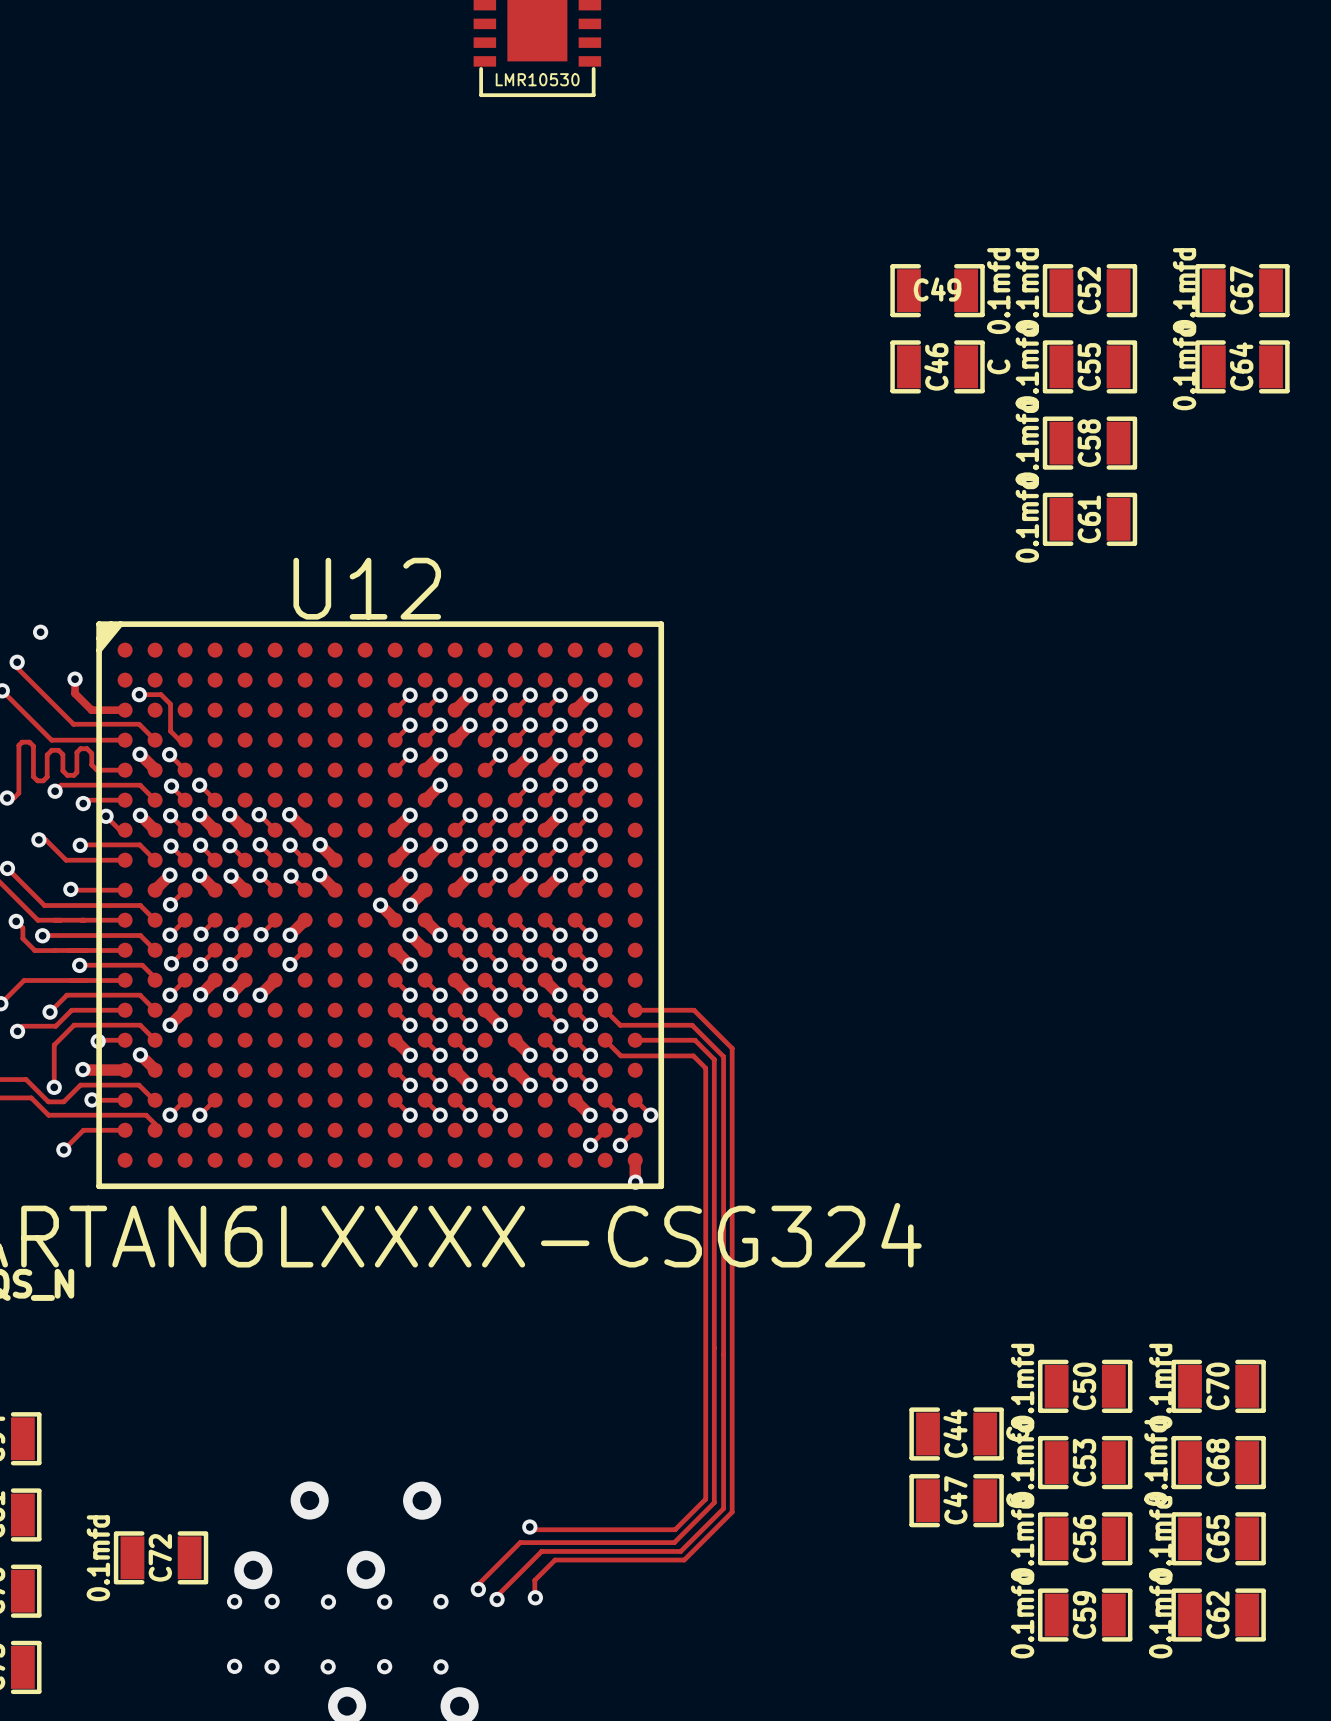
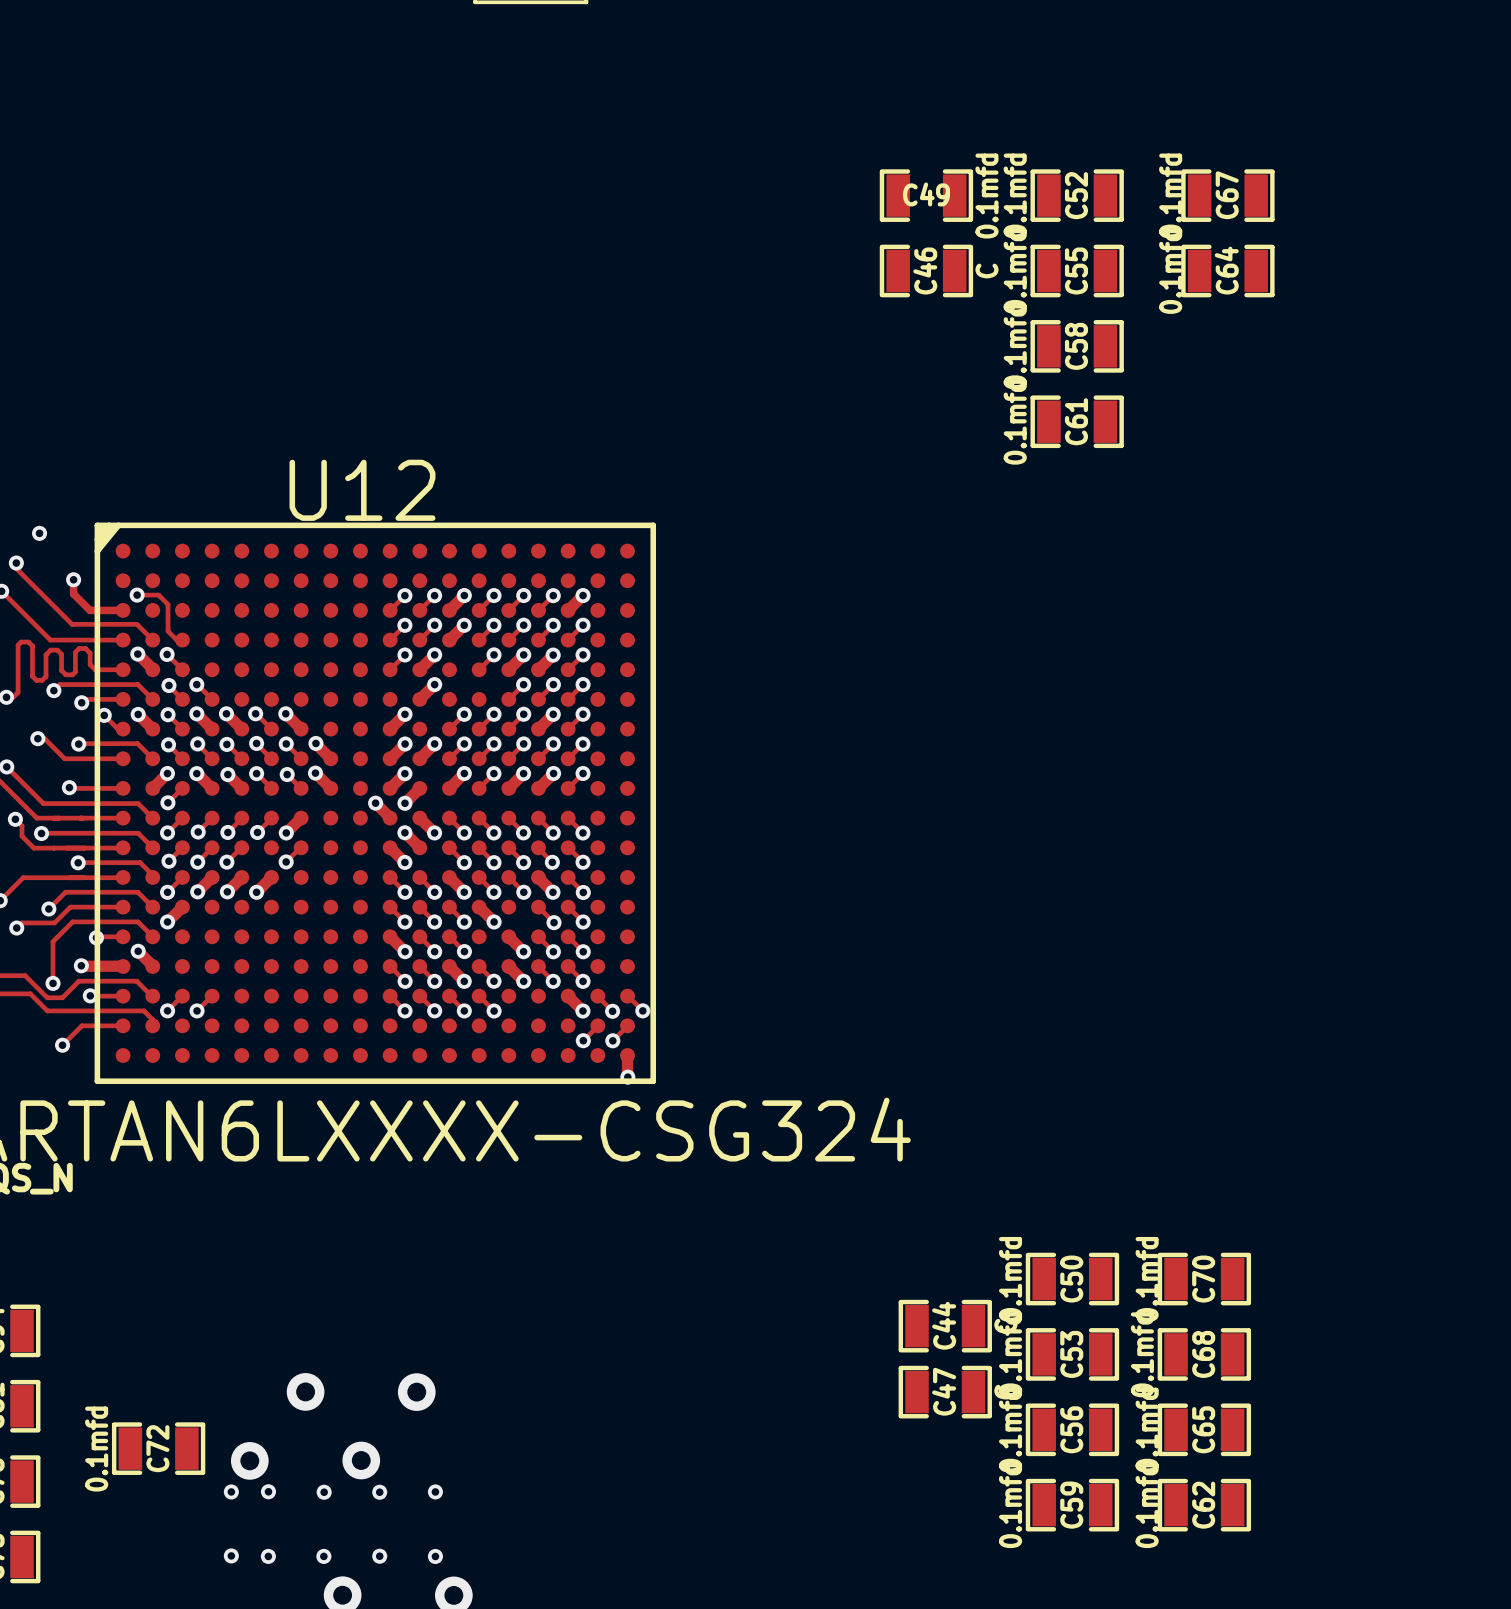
track: (605, 1010) (620, 1025) (692, 1025) (723, 1056) (723, 1508) (680, 1551) (541, 1551) (496, 1596) (496, 1599) -> none
track: (635, 1010) (694, 1010) (732, 1048) (732, 1512) (684, 1560) (555, 1560) (534, 1580) (535, 1597) -> none
track: (605, 1040) (620, 1055) (693, 1055) (705, 1068) (705, 1499) (675, 1529) (532, 1529) (529, 1527) -> none
track: (635, 1040) (695, 1040) (714, 1059) (714, 1502) (674, 1542) (520, 1542) (478, 1583) (478, 1589) -> none
via: (529, 1527) -> none
via: (478, 1589) -> none
via: (535, 1597) -> none
via: (497, 1599) -> none

